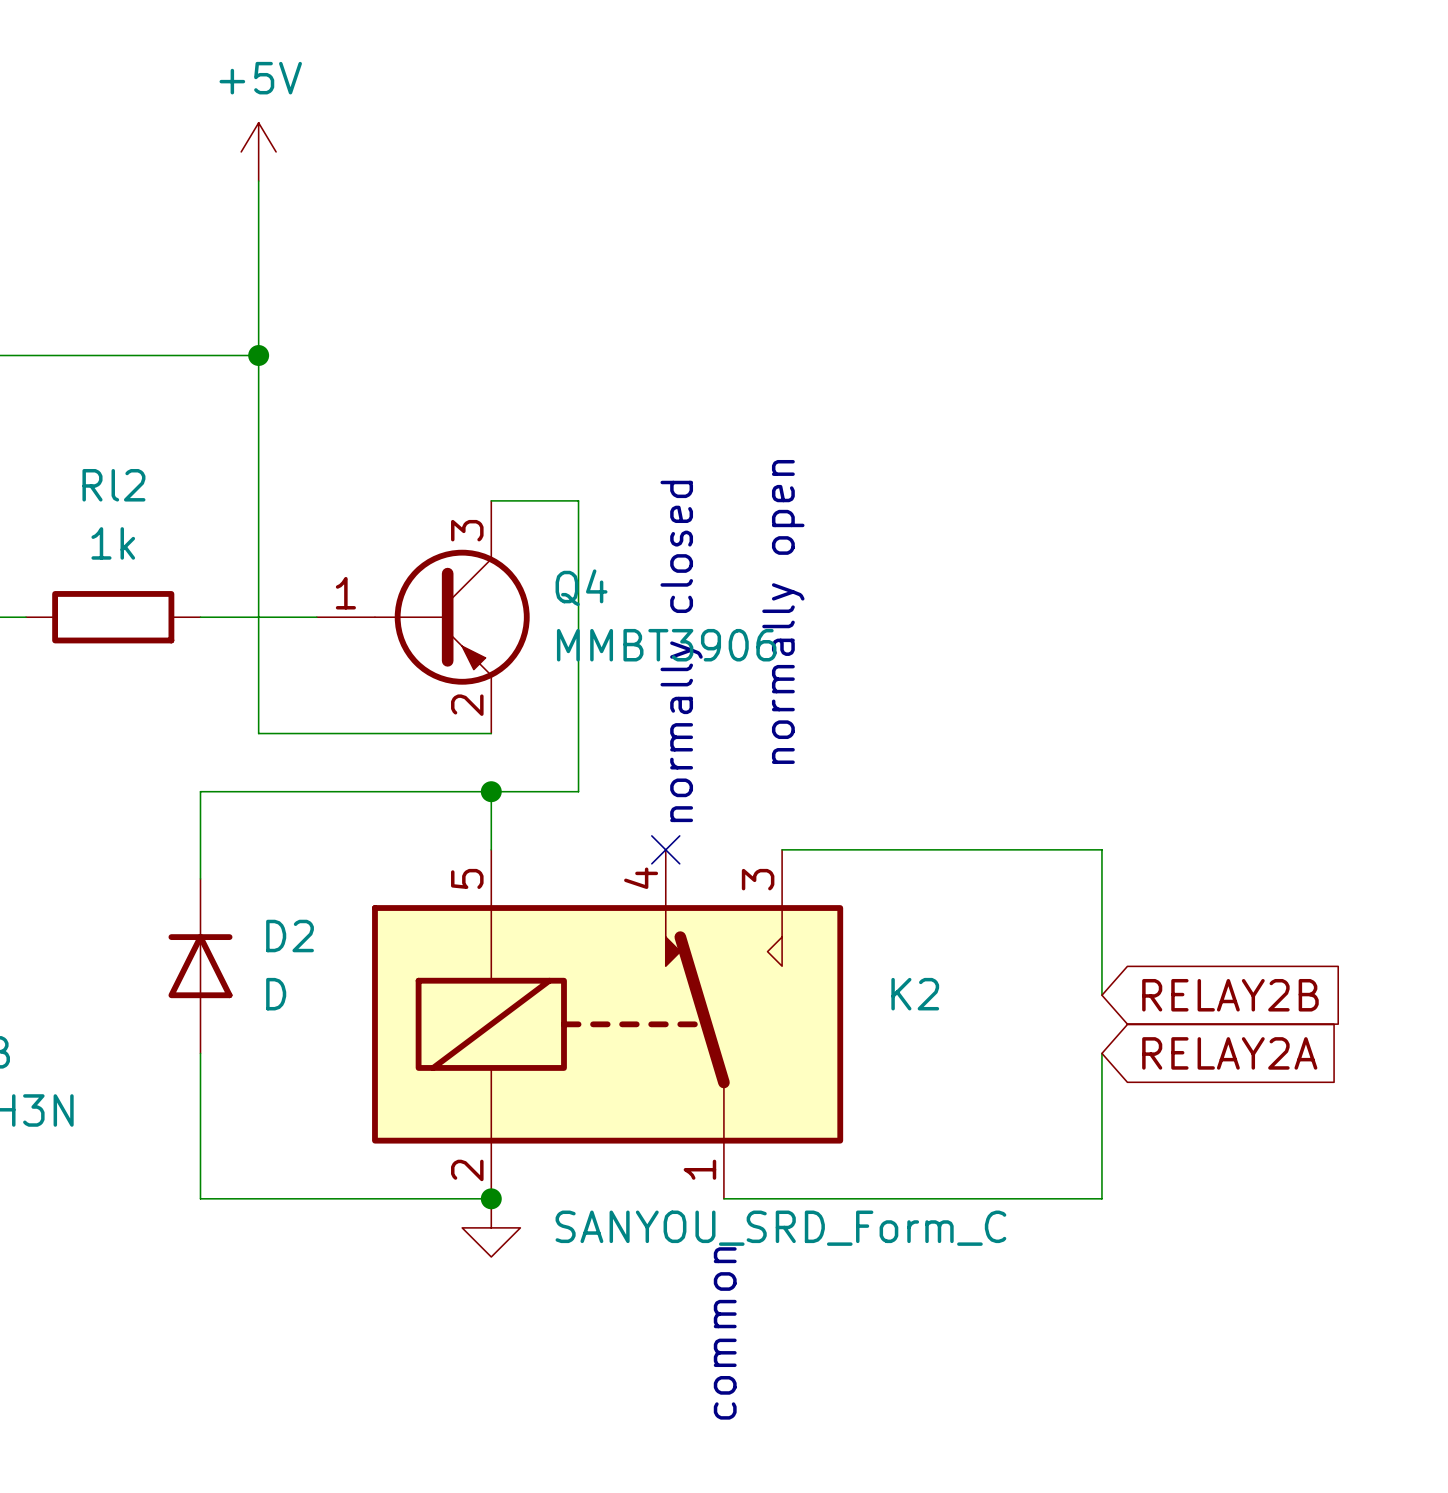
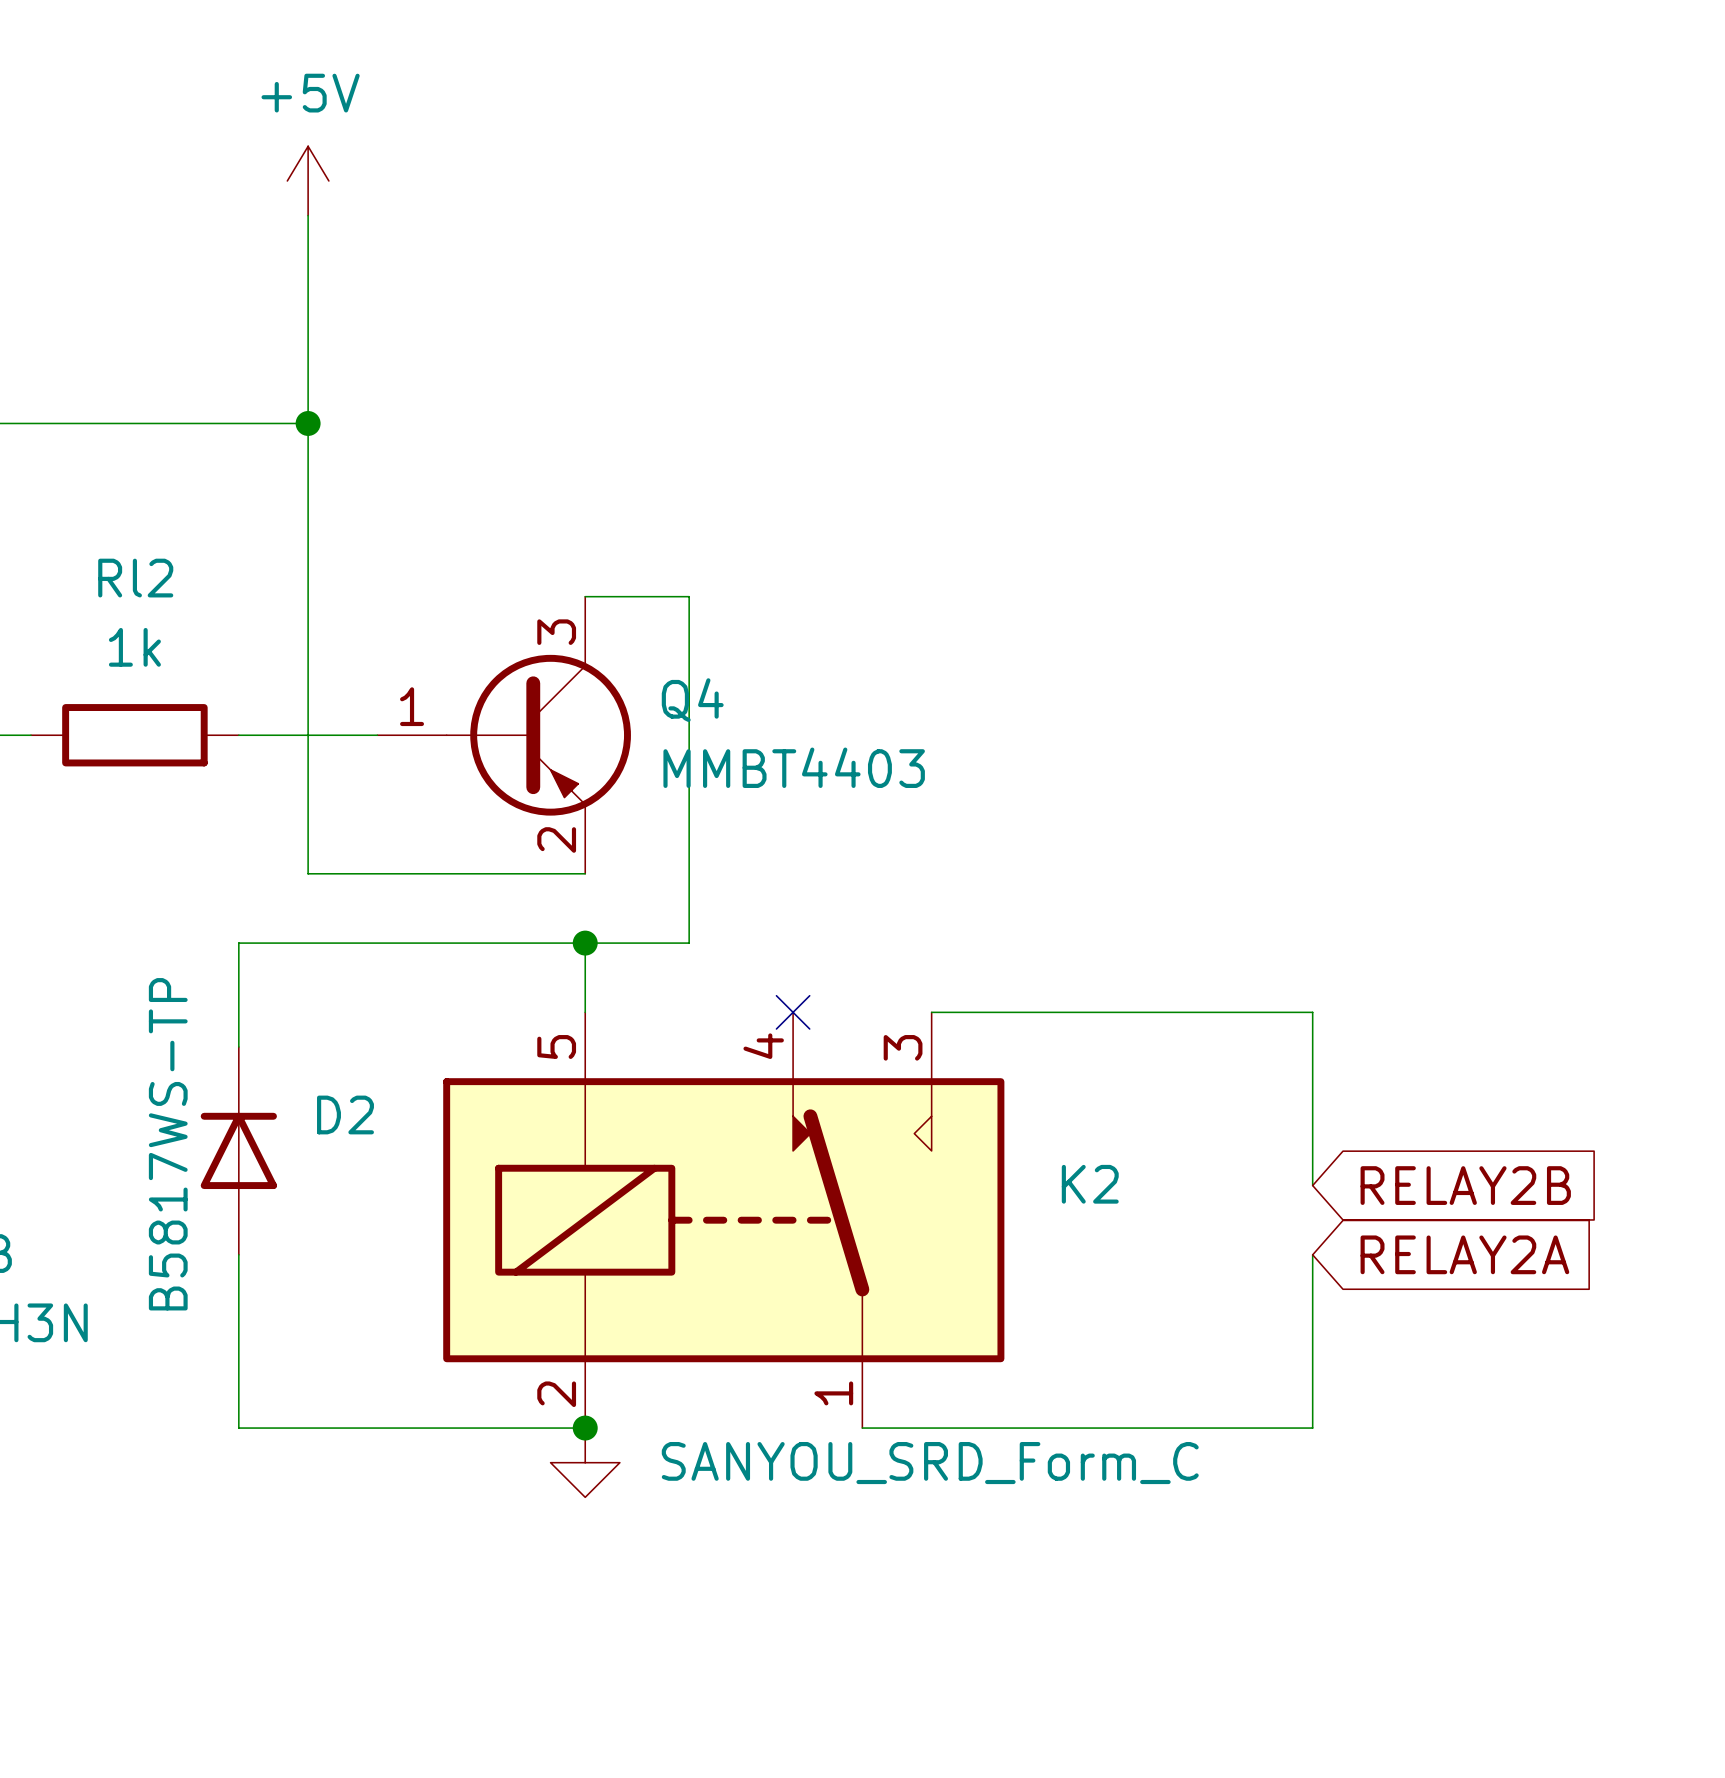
text: normally open (783, 611) -> none
Q4 value: MMBT3906 (666, 645) -> MMBT4403 (794, 767)
text: normally closed (681, 651) -> none
D2 value: D (276, 994) -> B5817WS-TP (168, 1144)
text: common (725, 1333) -> none

